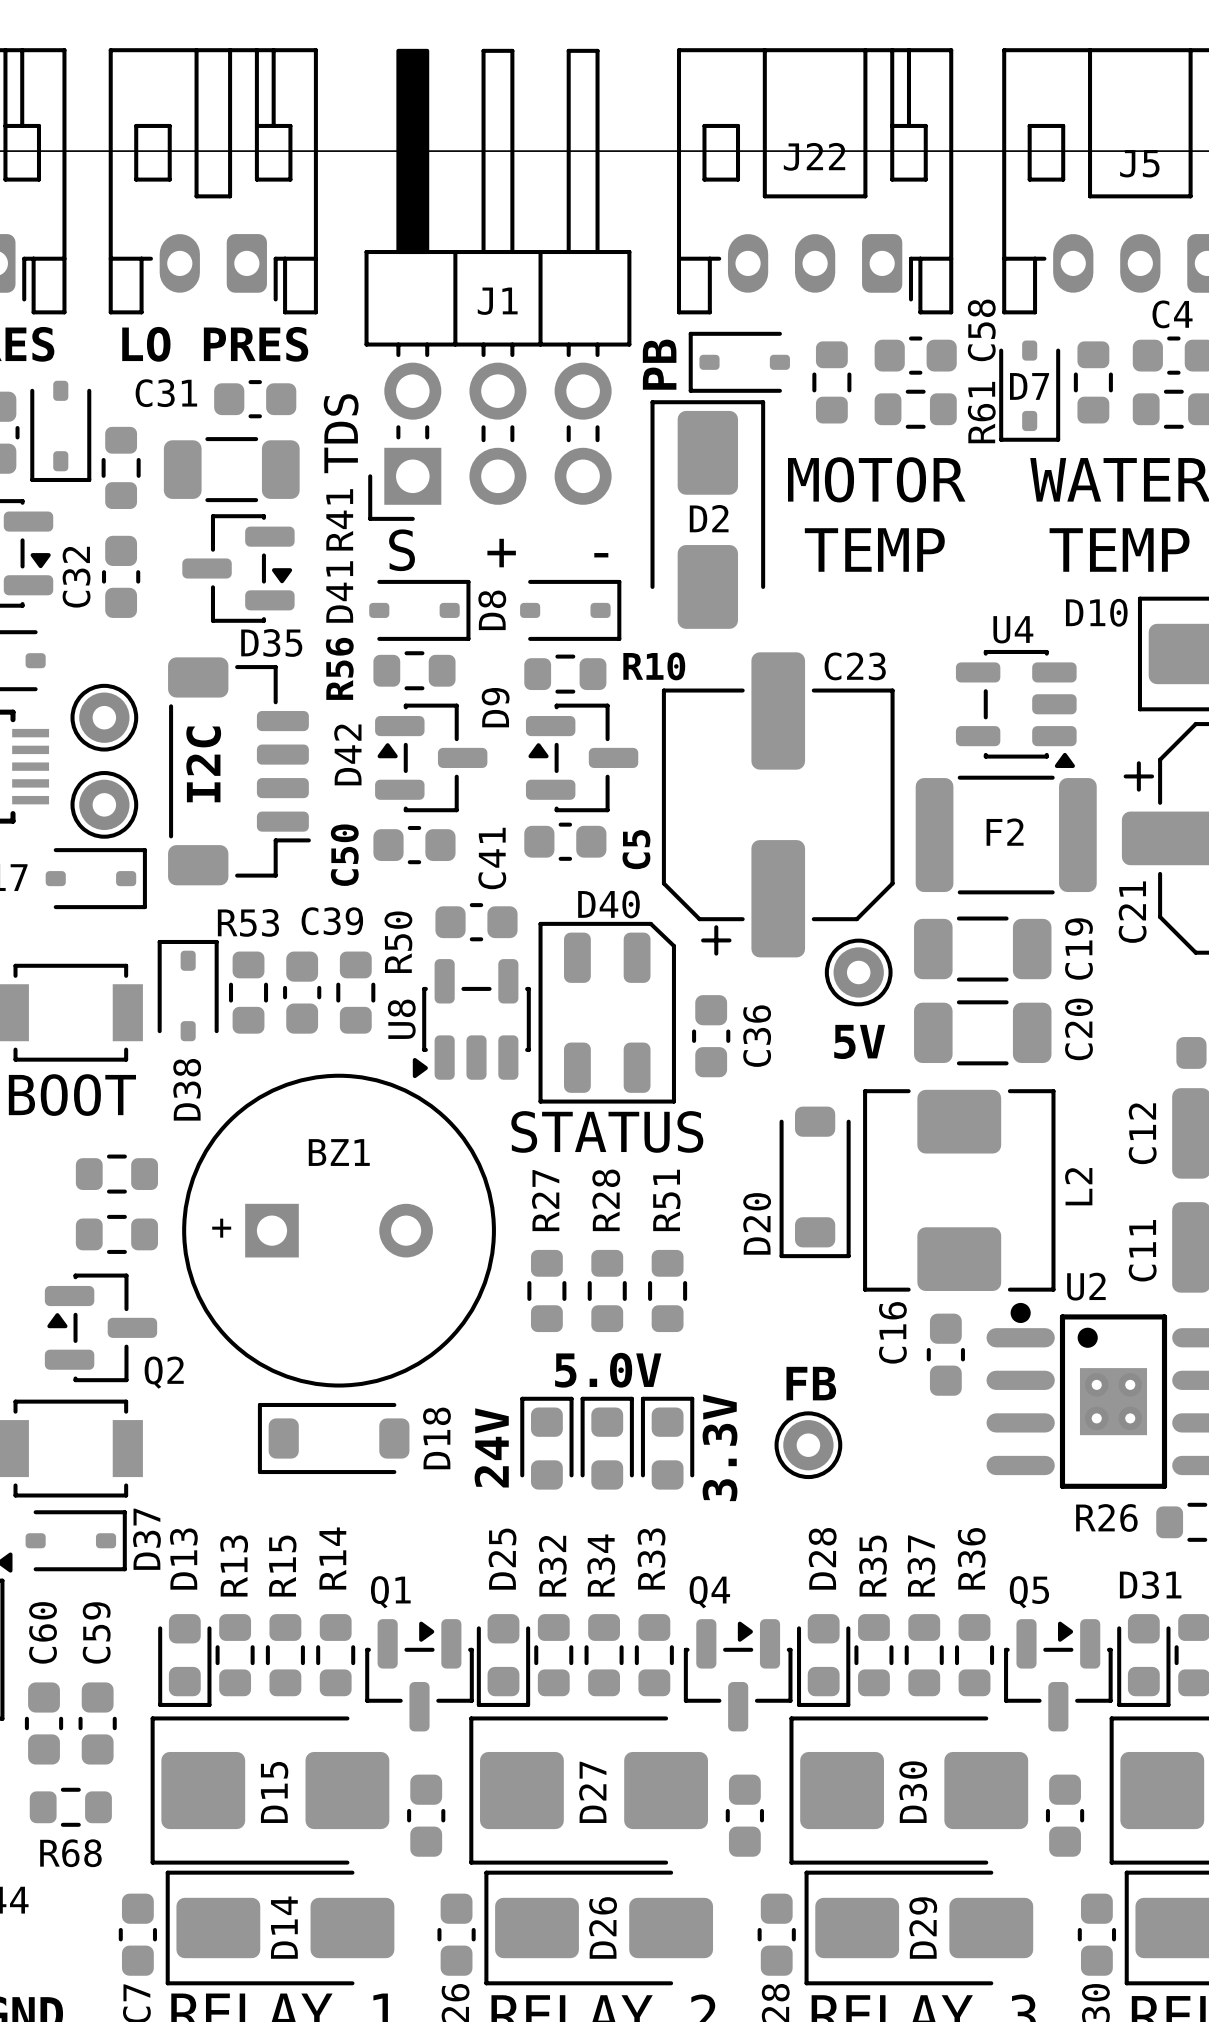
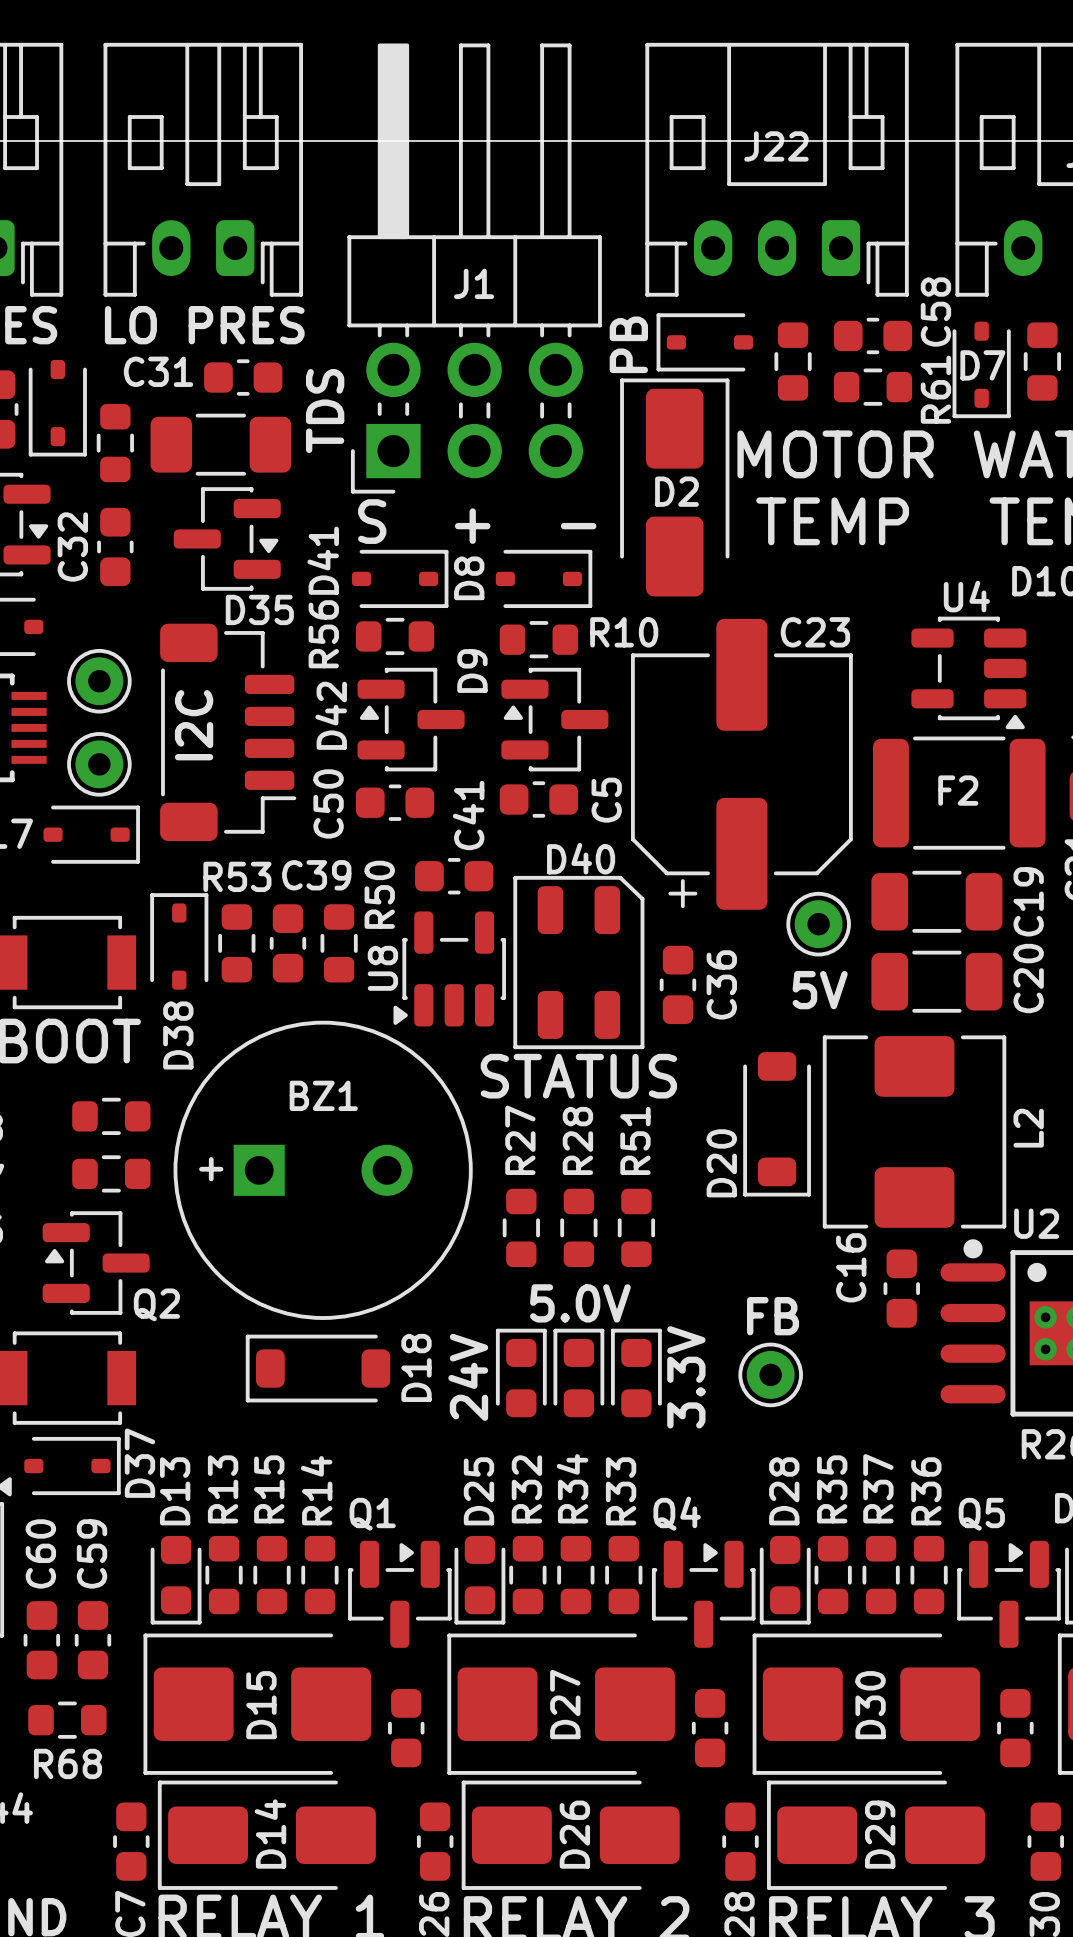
R41: (231, 469) -> none
part: none -> (220, 444)

